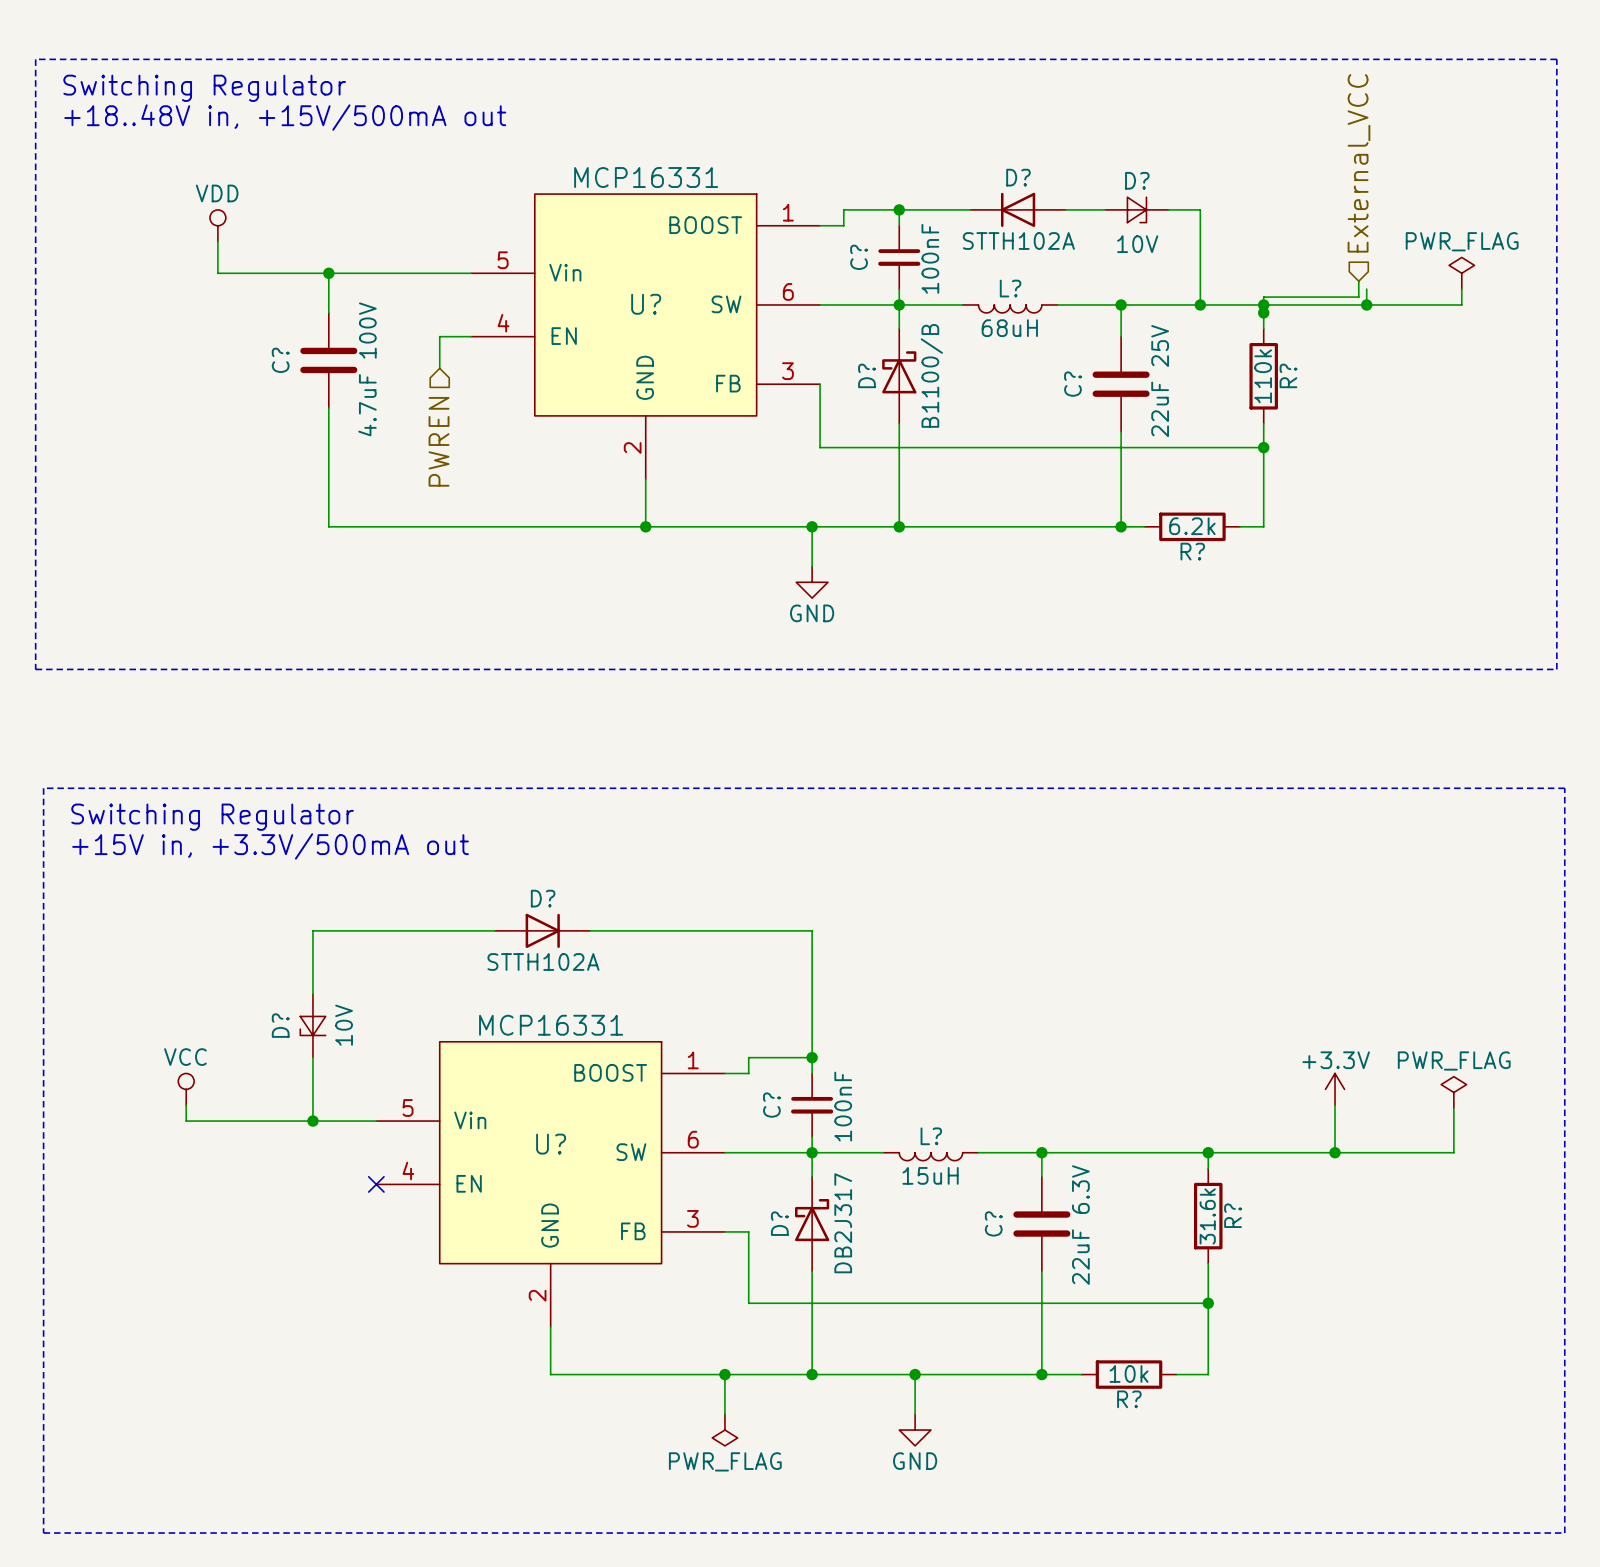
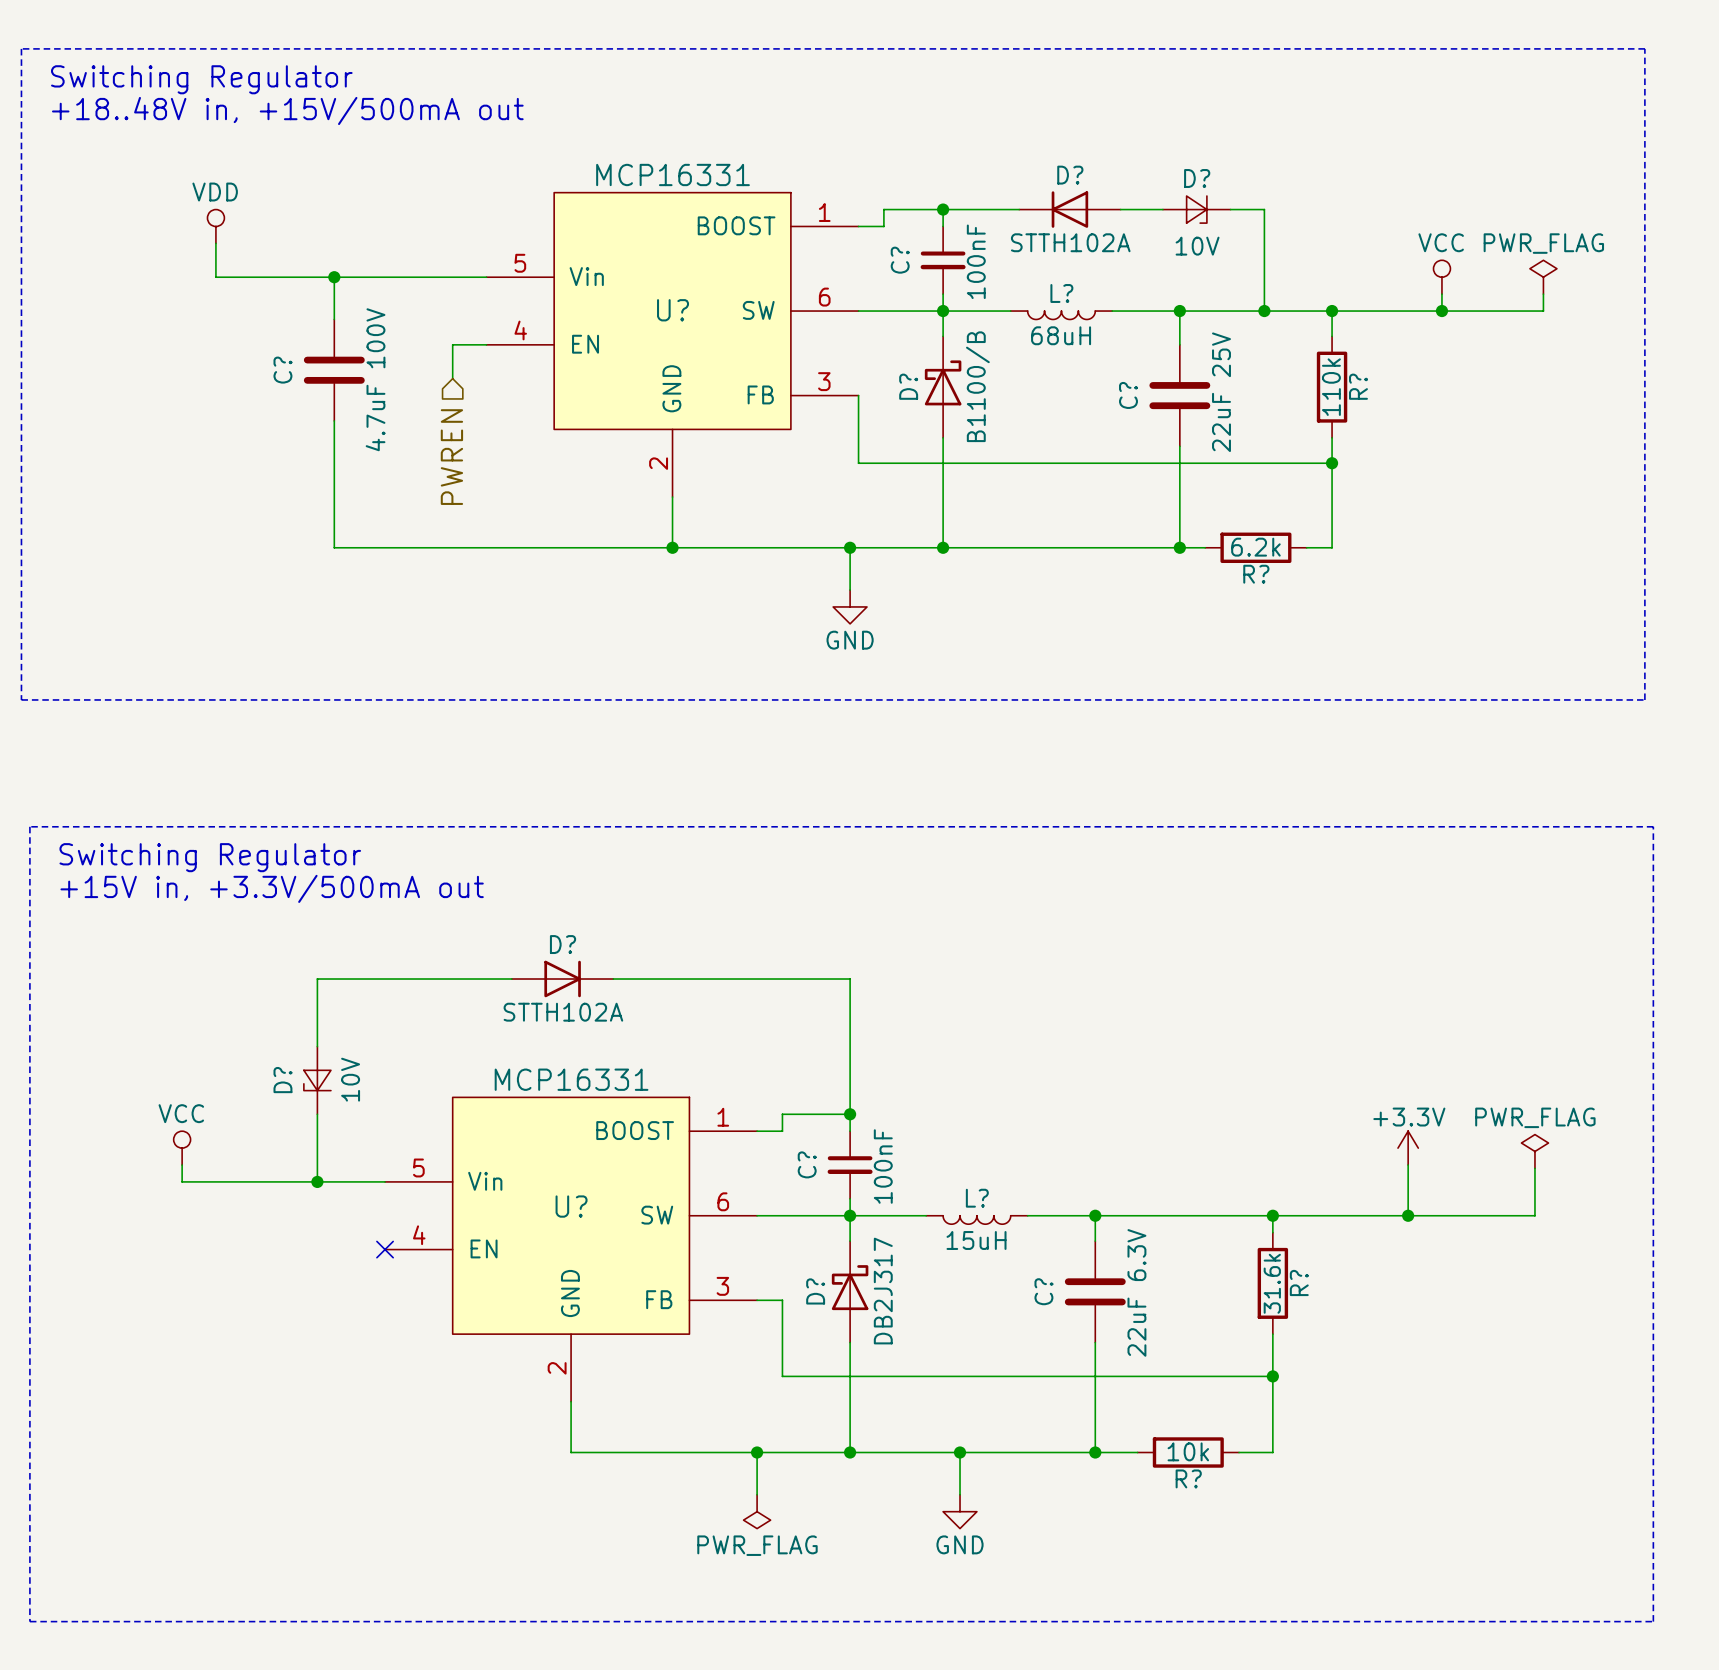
hierarchical label: External_VCC (1358, 163) -> none
power symbol: none -> VCC (1441, 277)
wire: (1358, 281) (1358, 297) (1263, 297) (1263, 304) -> none
junction: (1263, 312) -> none

